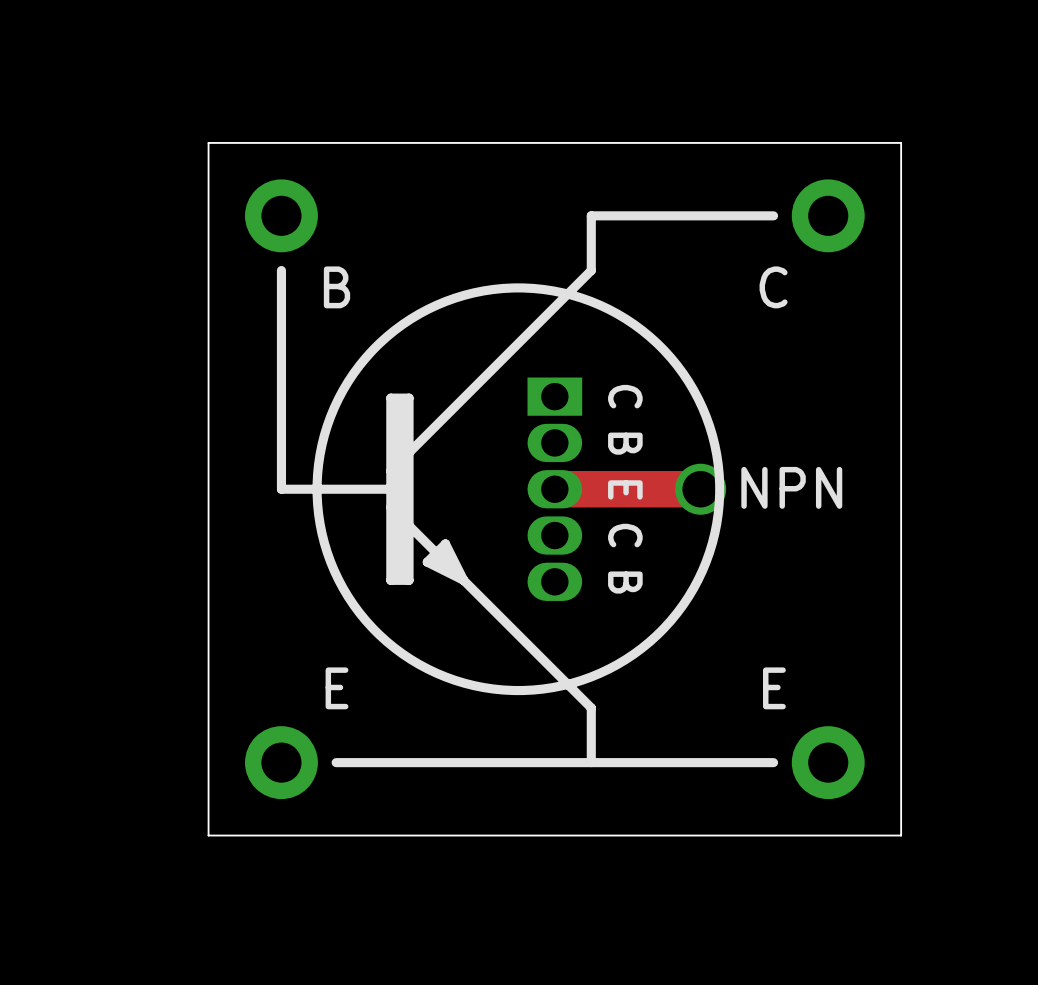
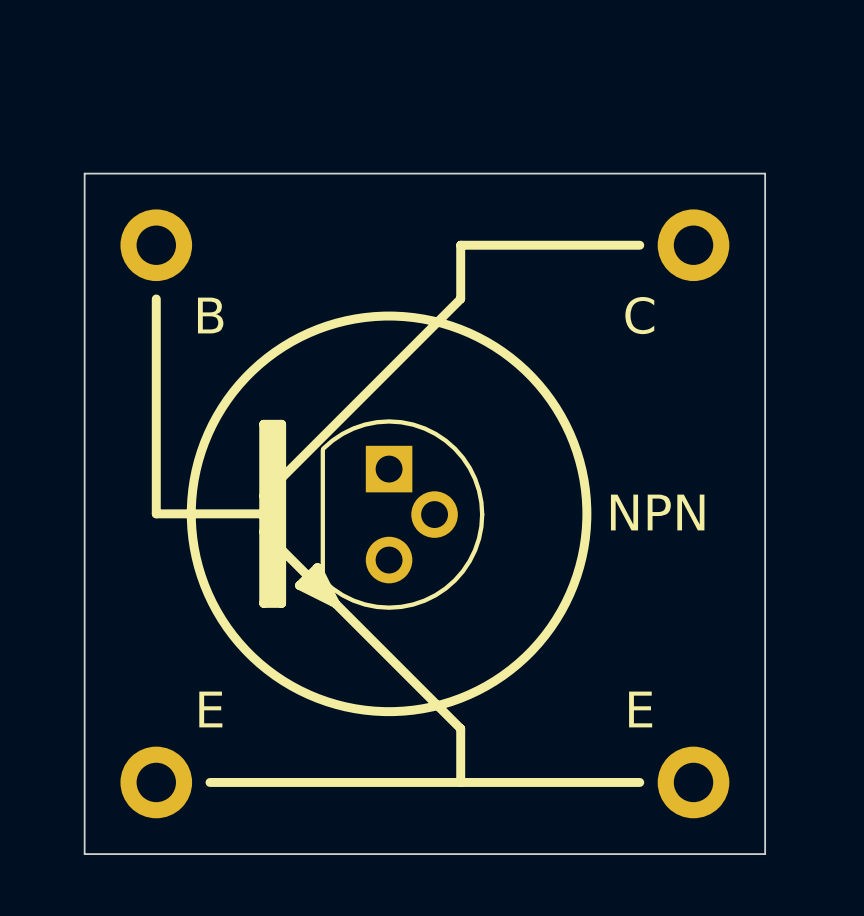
part footprint: [527, 377, 583, 601] -> [320, 419, 485, 610]
track: (554, 489) (700, 489) -> none
via: (700, 489) -> none

